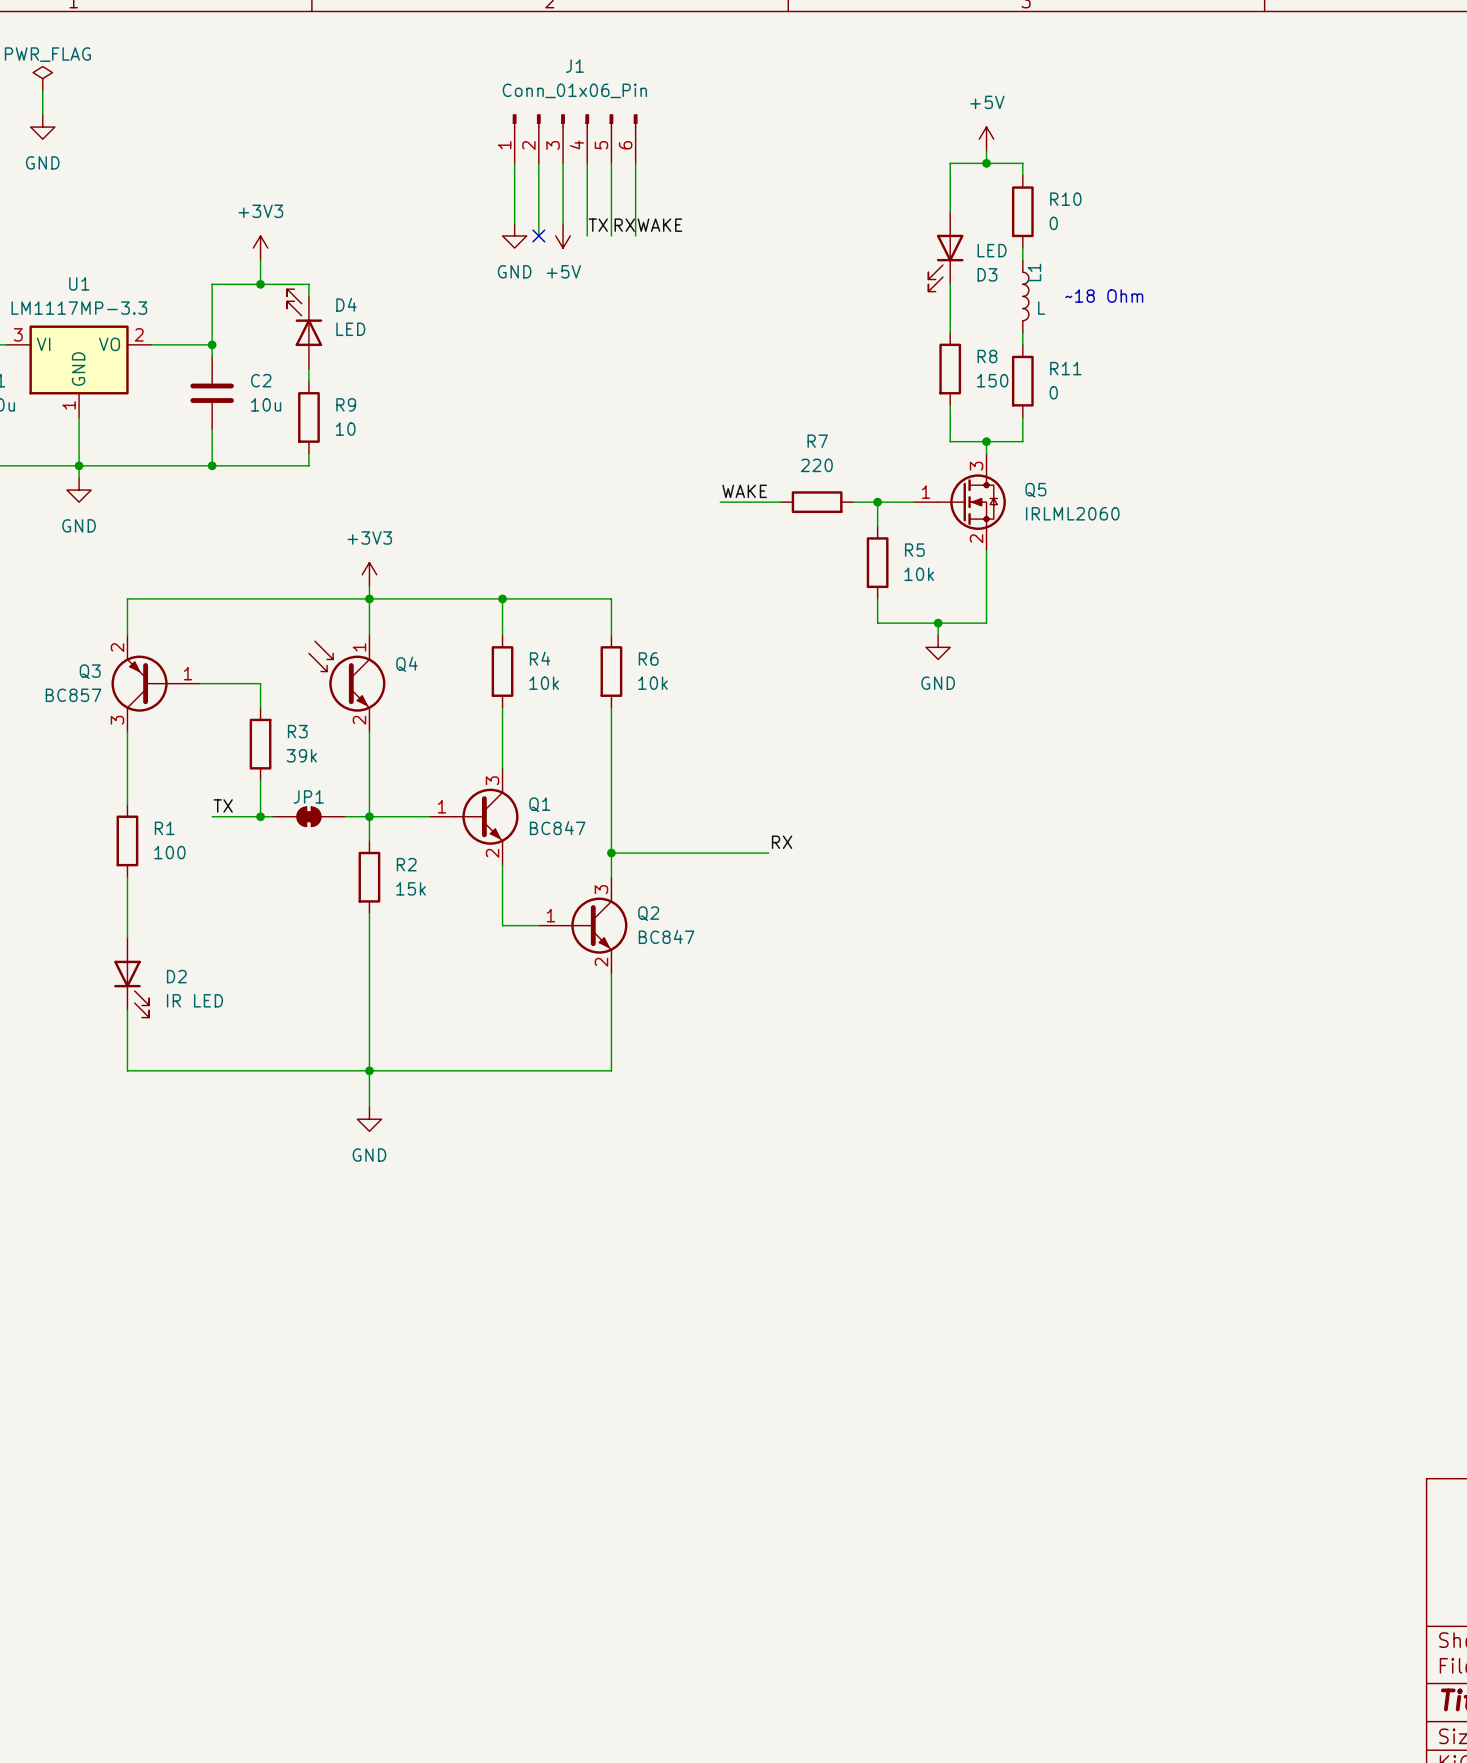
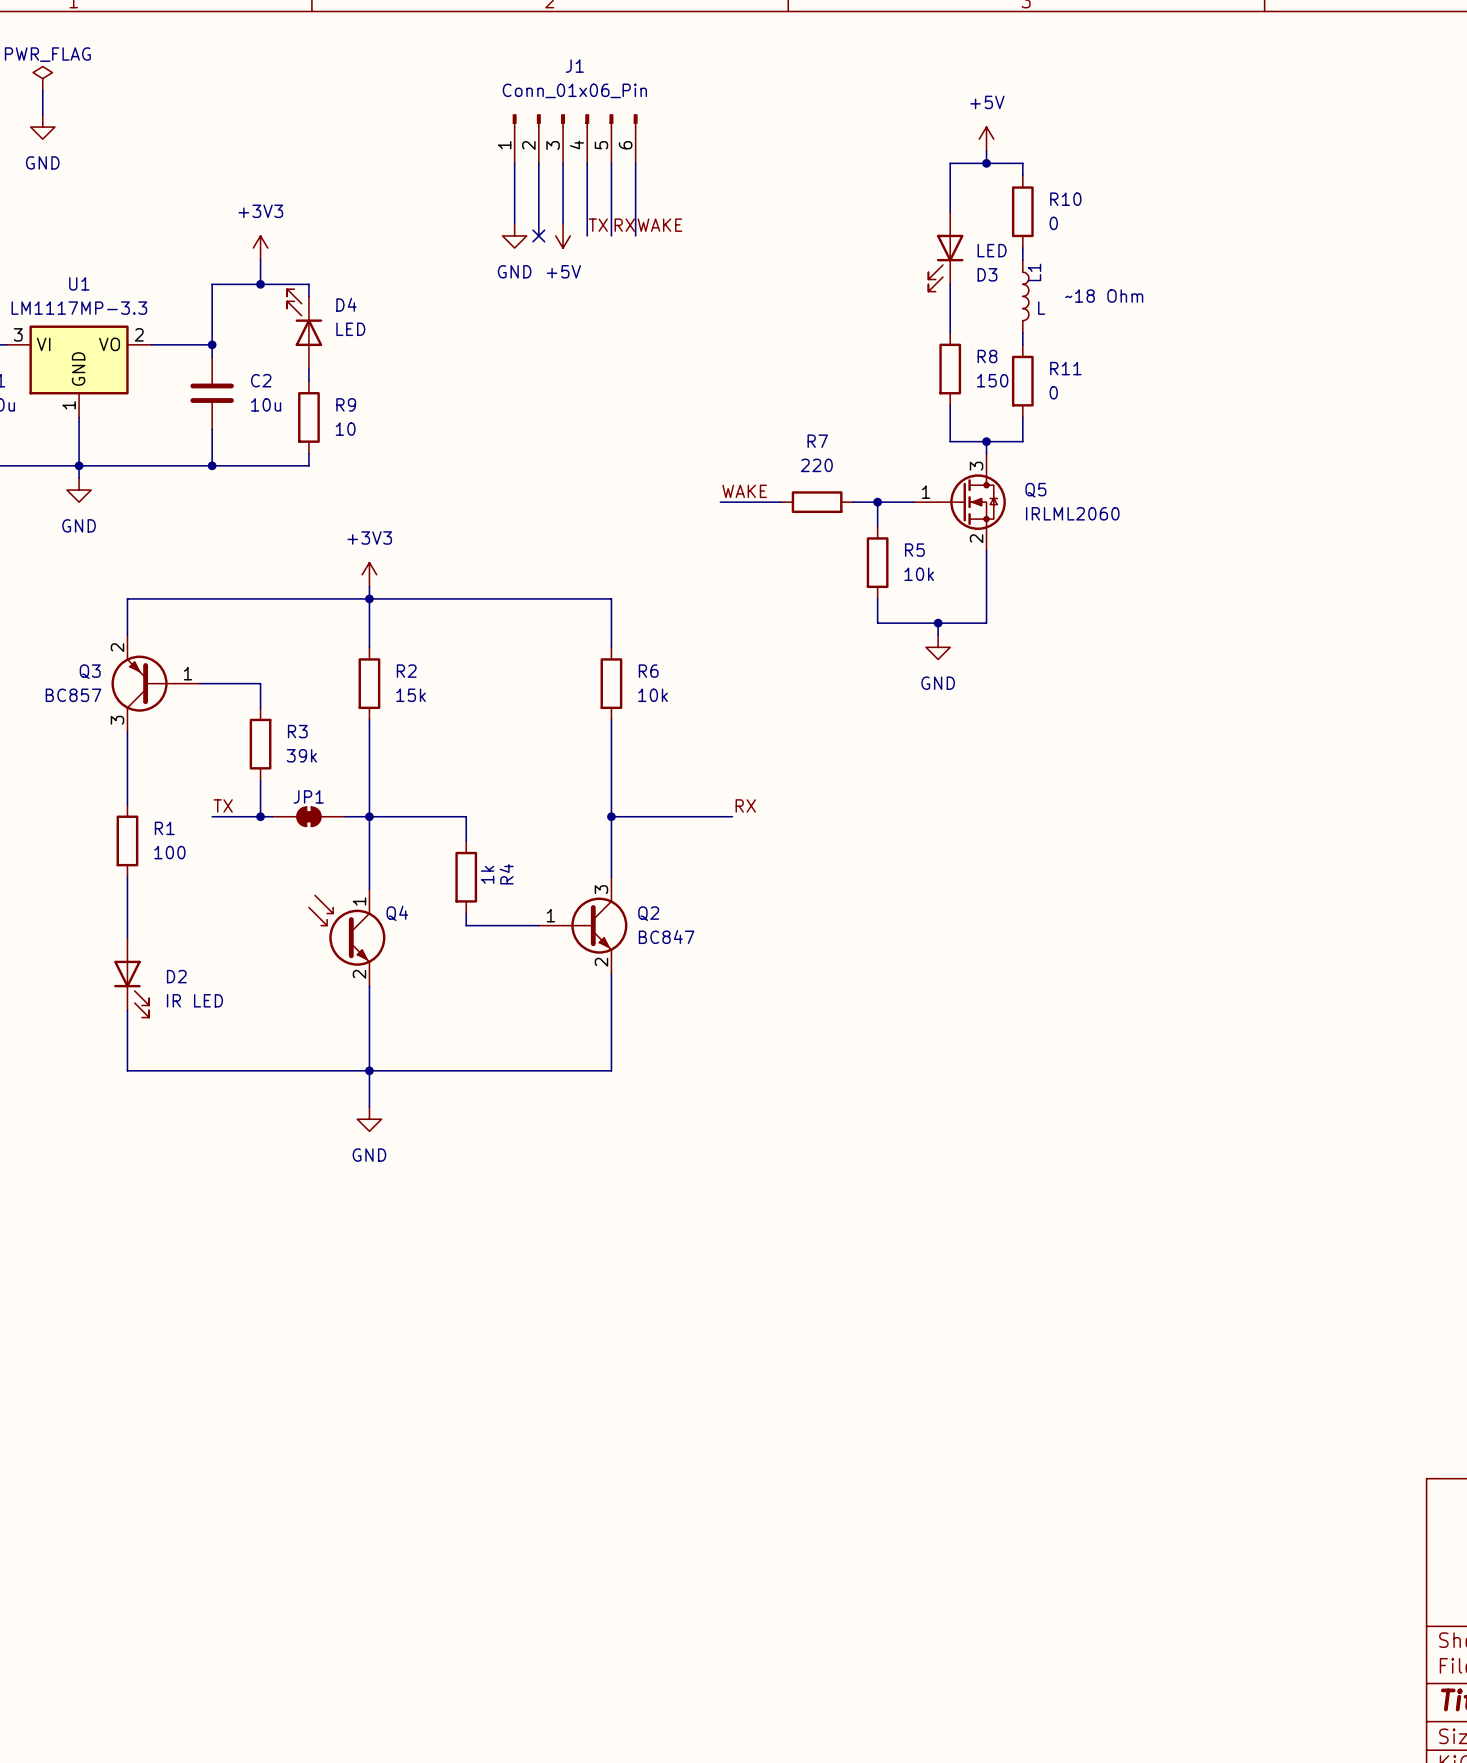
wire: (502, 598) (502, 635) -> none
junction: (502, 598) -> none
R4 name rotation: 0° (540, 658) -> 90° counterclockwise (506, 874)
Q4 name position: Q4 (406, 664) -> Q4 (397, 913)
R4 position: (502, 671) -> (466, 877)
R6 position: (611, 671) -> (611, 683)
Q4 position: (347, 683) -> (347, 937)
R4 value: 10k (544, 683) -> 1k (487, 874)
wire: (502, 707) (502, 768) -> none
Q1: BC847 (474, 816) -> none
wire: none -> (611, 816) (732, 816)
wire: none -> (369, 840) (369, 889)
label position: RX (782, 842) -> RX (745, 805)
wire: (611, 853) (768, 853) -> none
junction position: (611, 853) -> (611, 816)
wire: (502, 865) (502, 925) -> (466, 913) (466, 925) (502, 925)
R2 position: (369, 877) -> (369, 683)
wire: (369, 913) (369, 986) -> none

